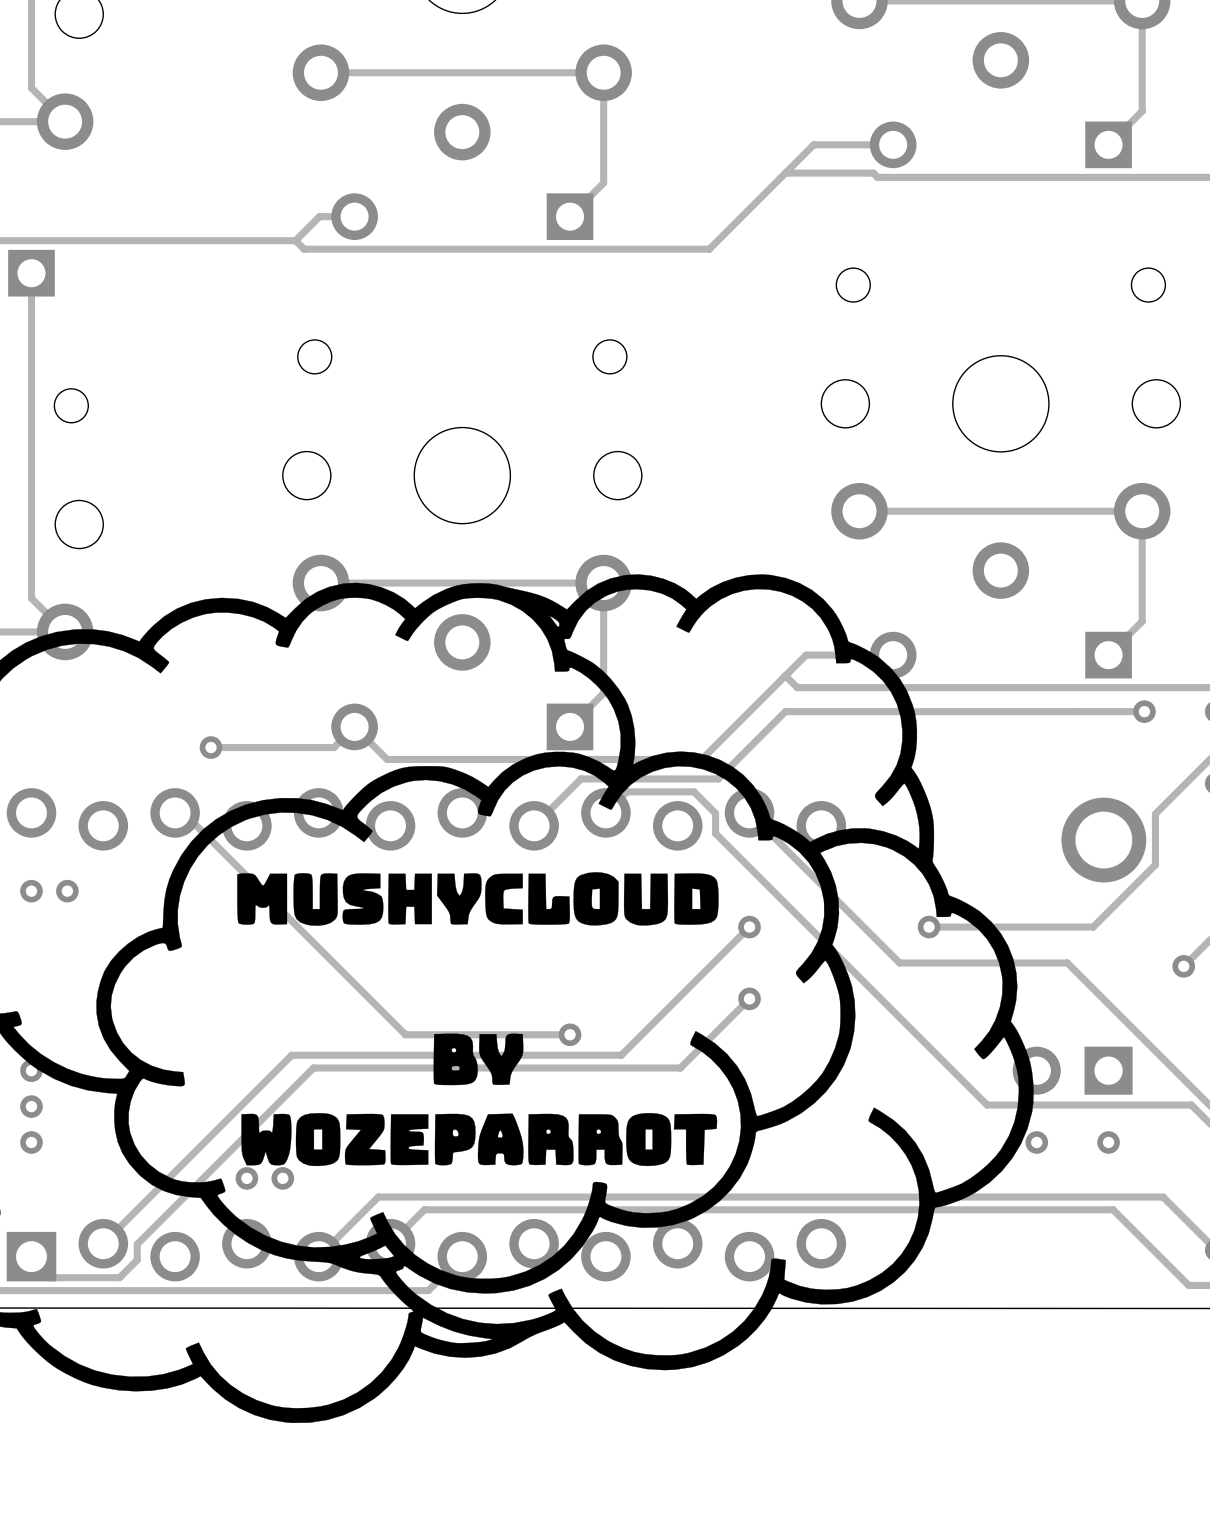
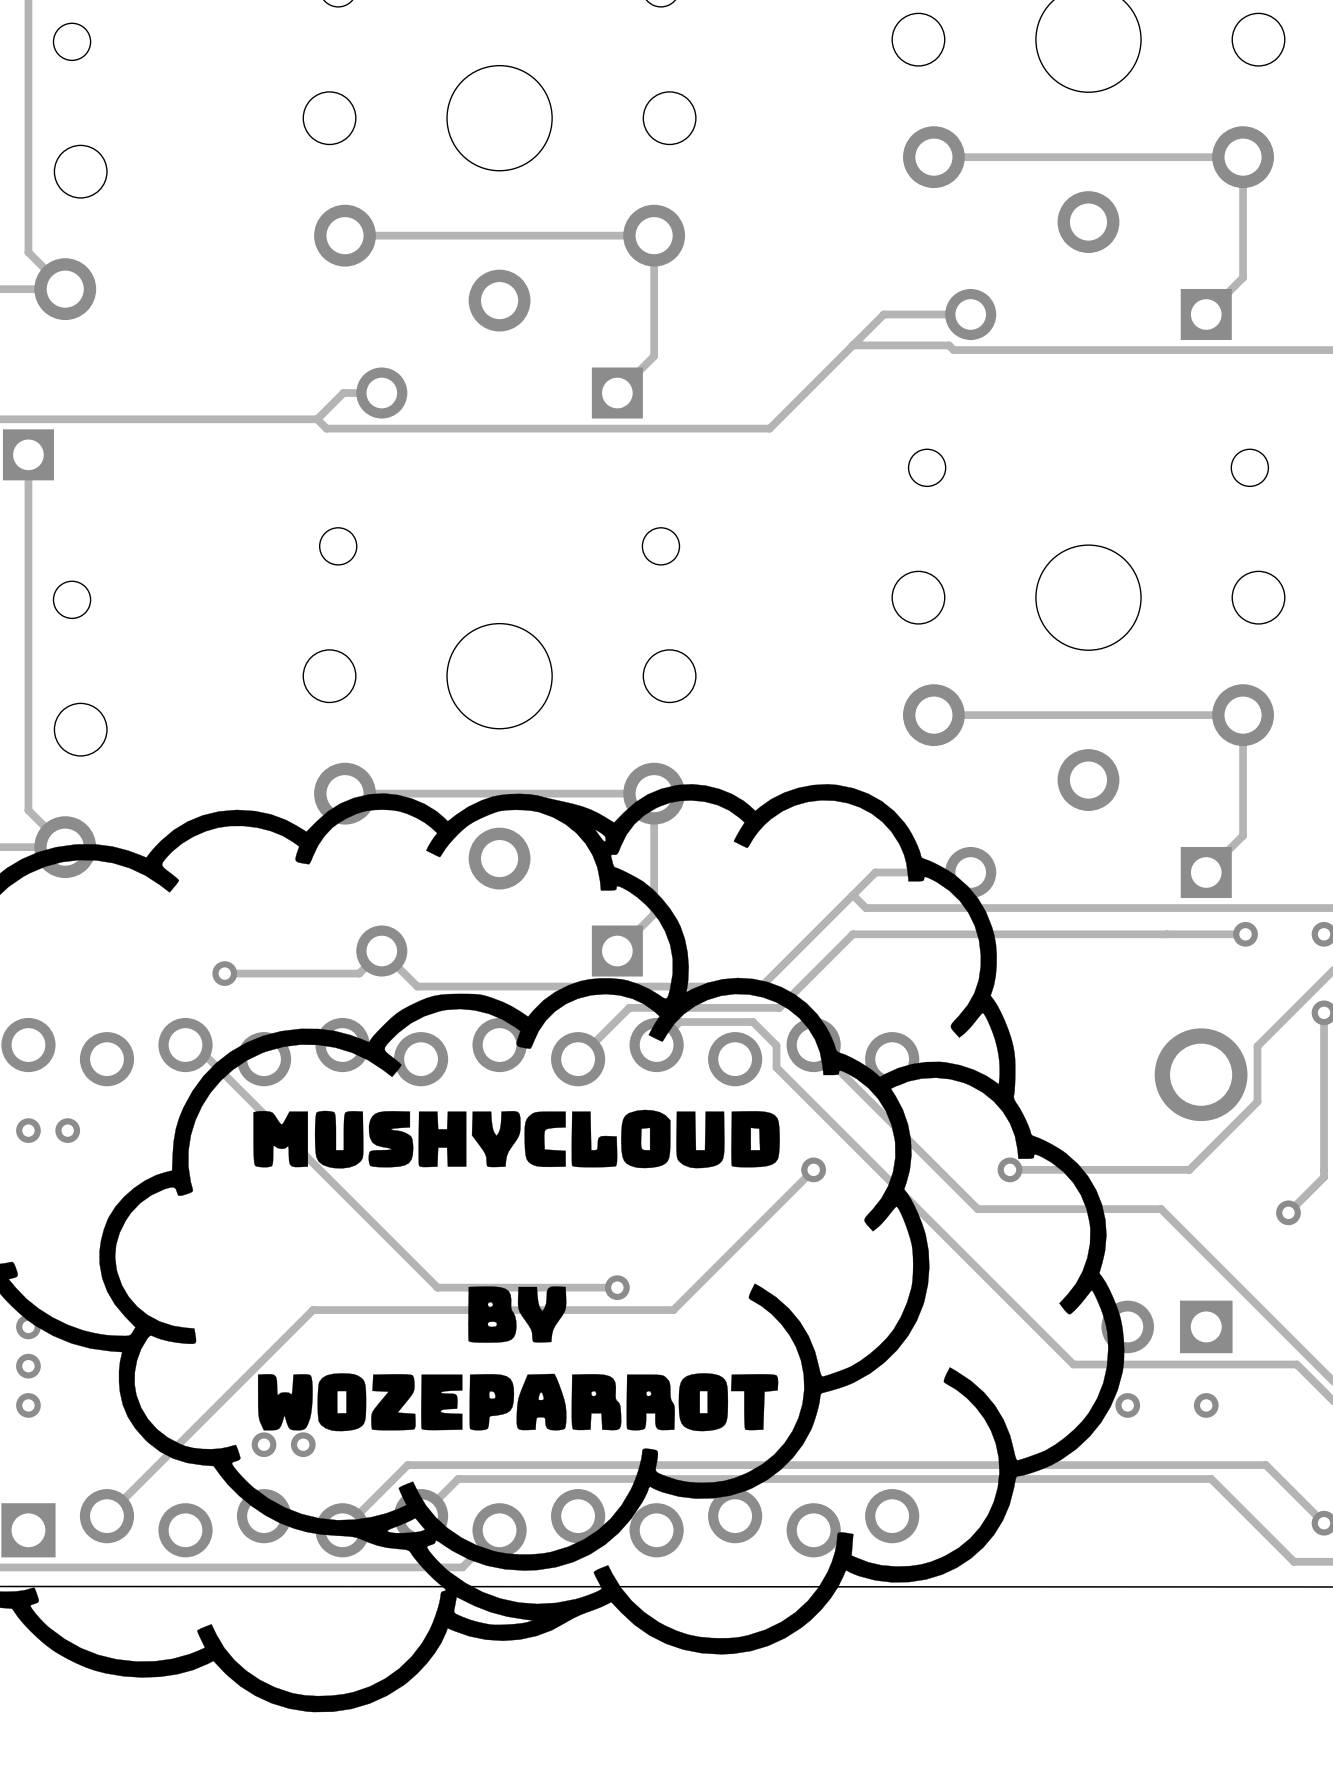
track: (749, 998) (680, 1068) (313, 1068) (137, 1244) (137, 1260) (119, 1277) (52, 1277) (31, 1256) -> none
via: (749, 998) -> none

